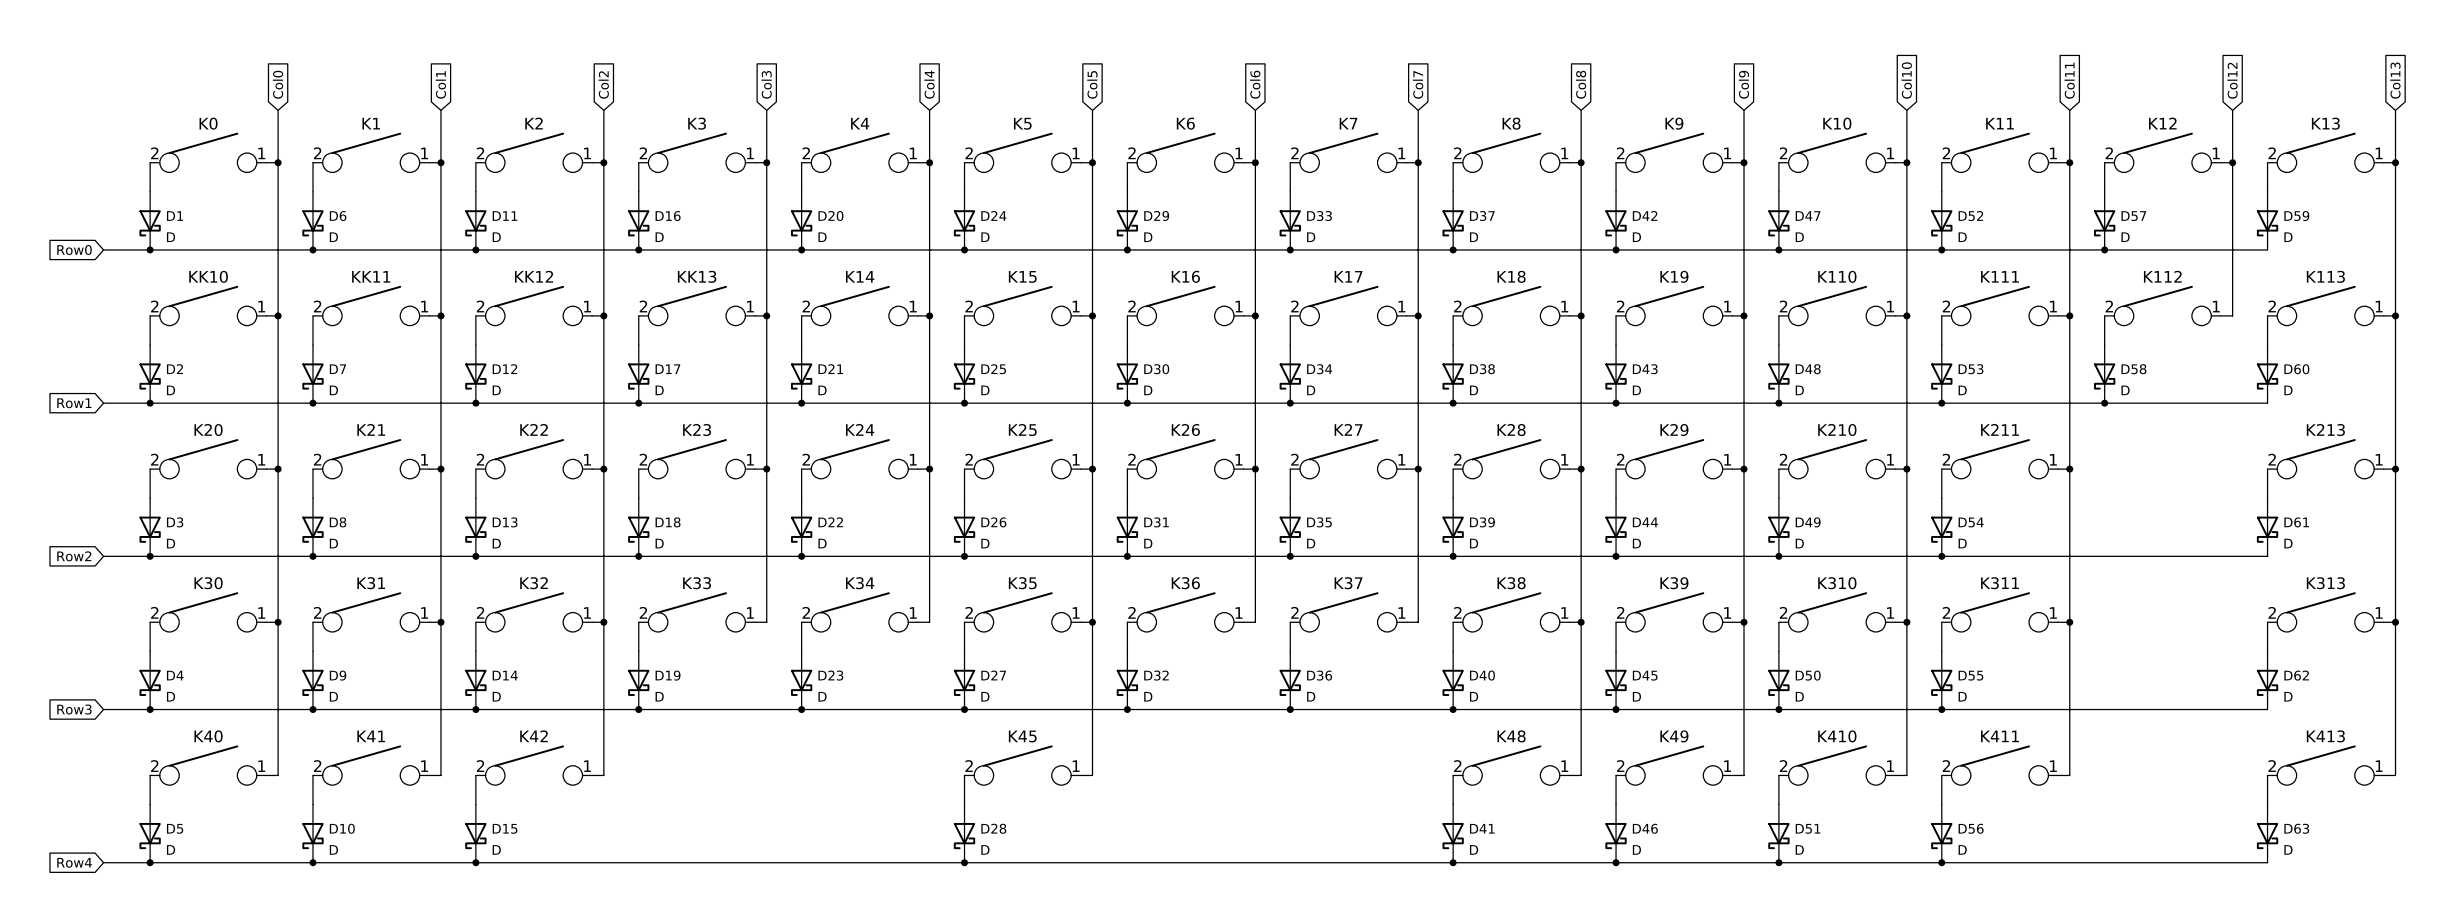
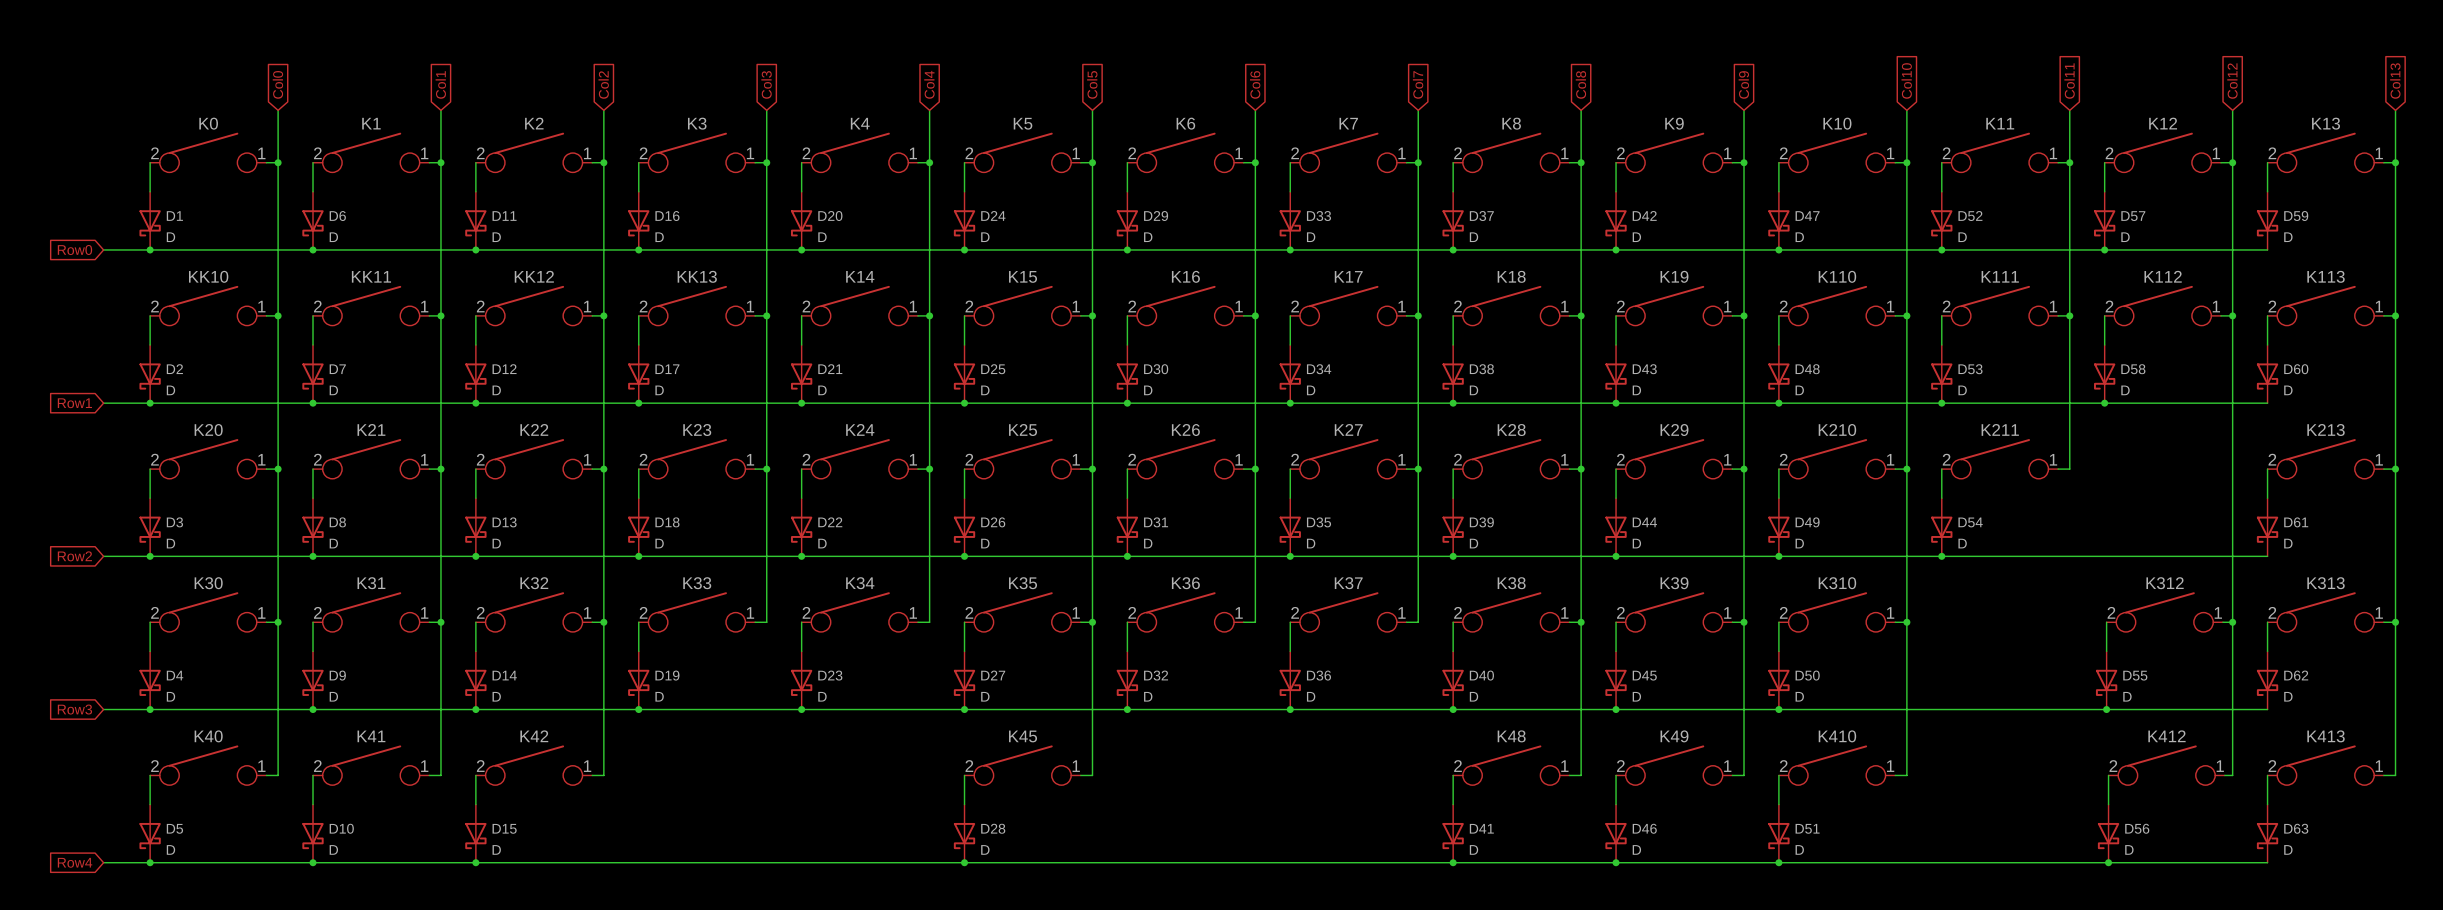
wire: none -> (2232, 315) (2232, 775) (2224, 775)
junction: none -> (2232, 315)
wire: (2069, 469) (2069, 775) (2058, 775) -> none
junction: (2069, 469) -> none
K311: (1999, 612) -> none
K312: none -> (2164, 612)
wire: (1941, 622) (1941, 651) -> (2106, 622) (2106, 651)
wire: (2058, 622) (2069, 622) -> none
junction: (2069, 622) -> none
wire: none -> (2222, 622) (2232, 622)
junction: none -> (2232, 622)
D55 position: (1941, 680) -> (2106, 680)
junction: (1941, 709) -> none
junction: none -> (2106, 709)
K411: (1999, 765) -> none
K412: none -> (2166, 765)
wire: (1941, 775) (1941, 804) -> (2108, 775) (2108, 804)
D56 position: (1941, 833) -> (2108, 833)
junction: (1941, 862) -> none
junction: none -> (2108, 862)

